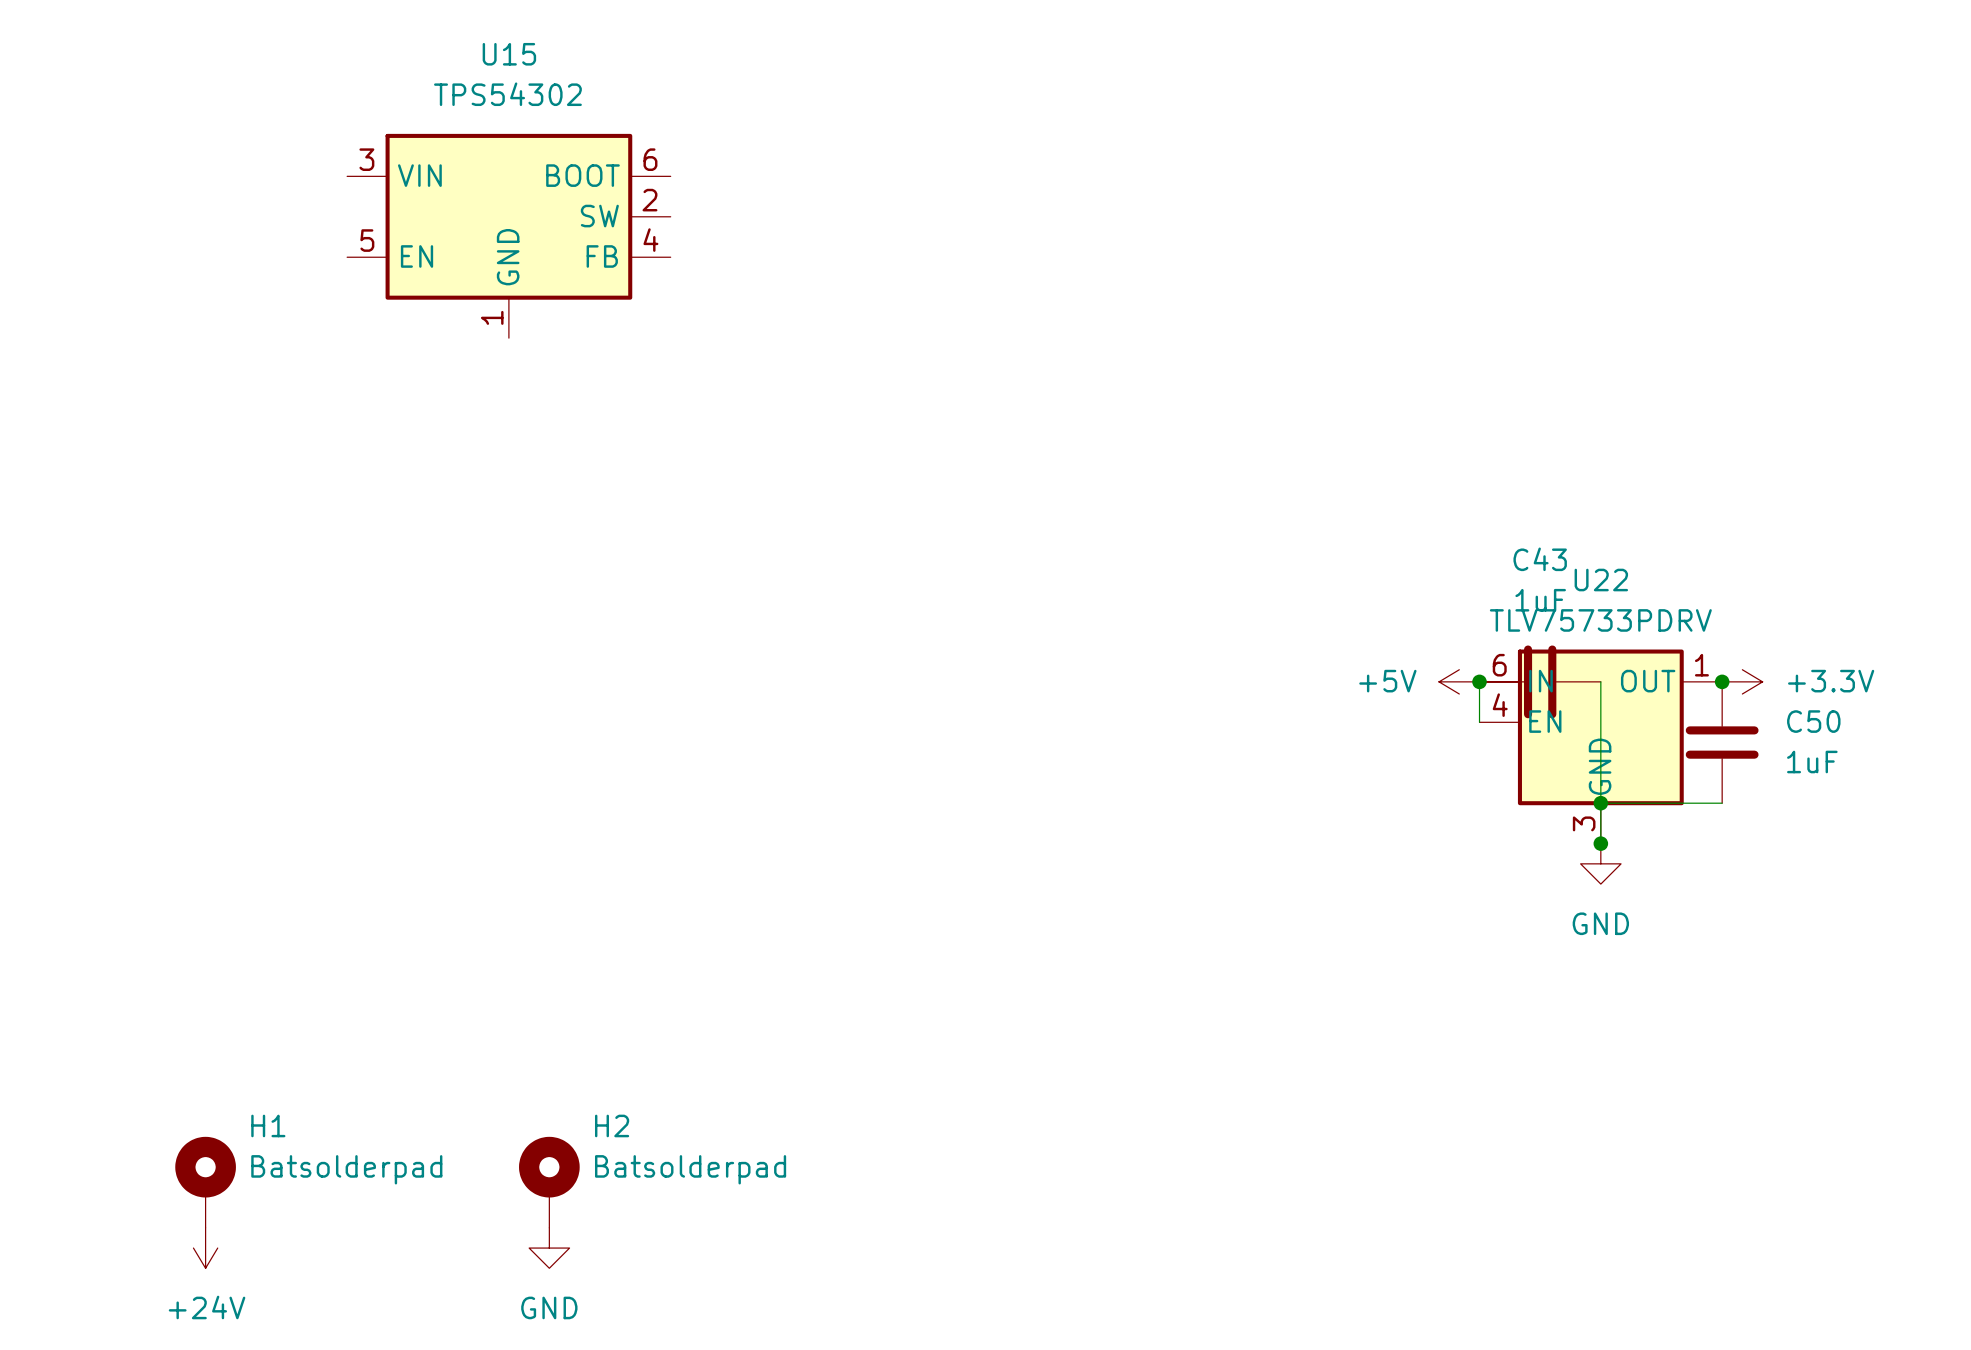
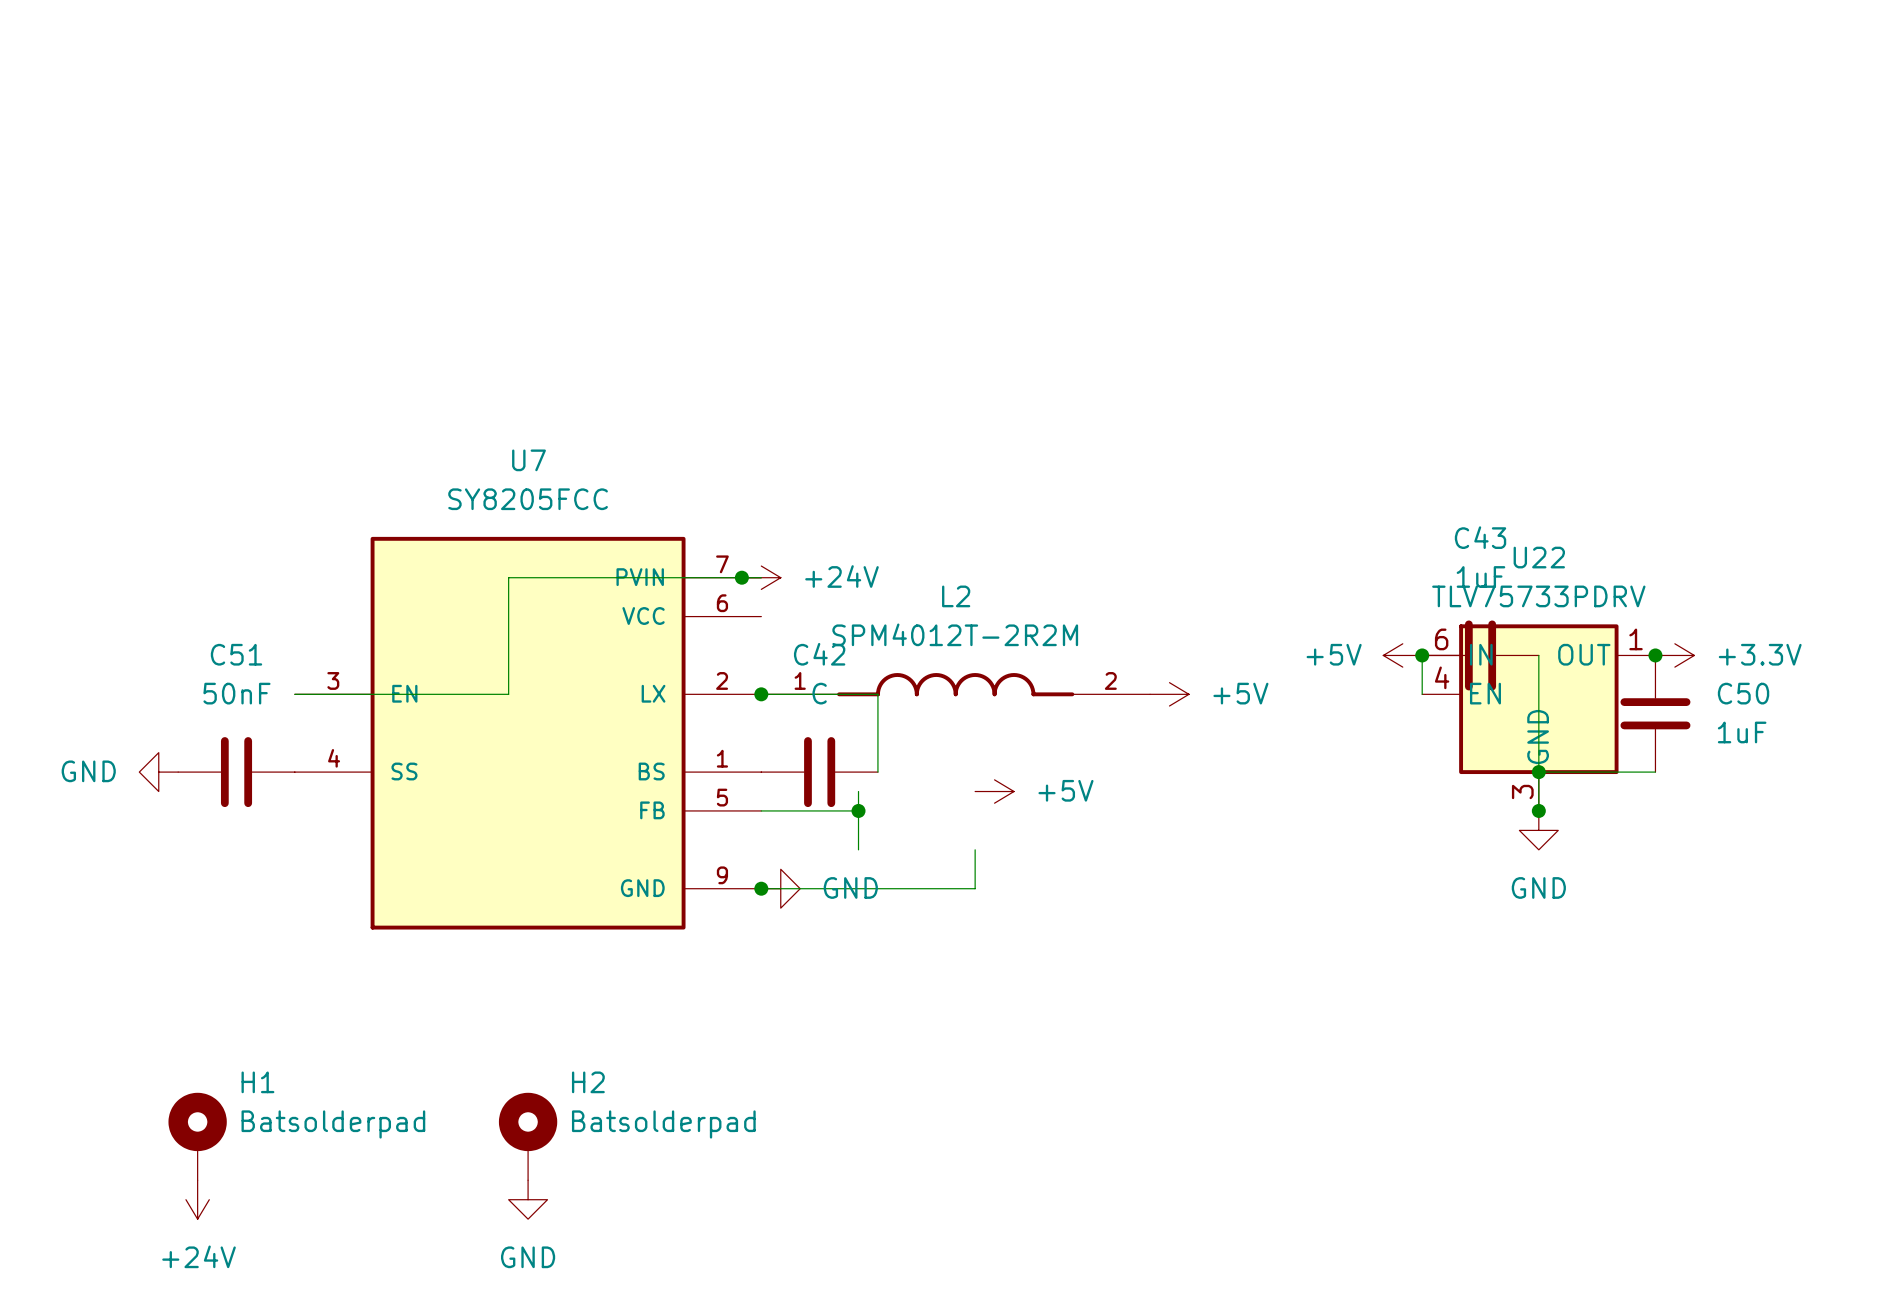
U15: TPS54302 (508, 236) -> none
junction: none -> (741, 577)
wire: none -> (761, 577) (508, 577) (508, 694) (294, 694)
power symbol: none -> +24V (761, 577)
L2: none -> SPM4012T-2R2M (955, 684)
wire: none -> (761, 694) (877, 694) (877, 772)
junction: none -> (761, 694)
power symbol: none -> +5V (1169, 694)
U7: none -> SY8205FCC (528, 733)
power symbol: none -> GND (158, 772)
C51: none -> 50nF (236, 772)
C42: none -> C (819, 772)
wire: none -> (858, 791) (858, 849)
power symbol: none -> +5V (994, 791)
wire: none -> (761, 810) (858, 810)
junction: none -> (858, 810)
wire: none -> (975, 849) (975, 888) (761, 888)
junction: none -> (761, 888)
power symbol: none -> GND (780, 888)

